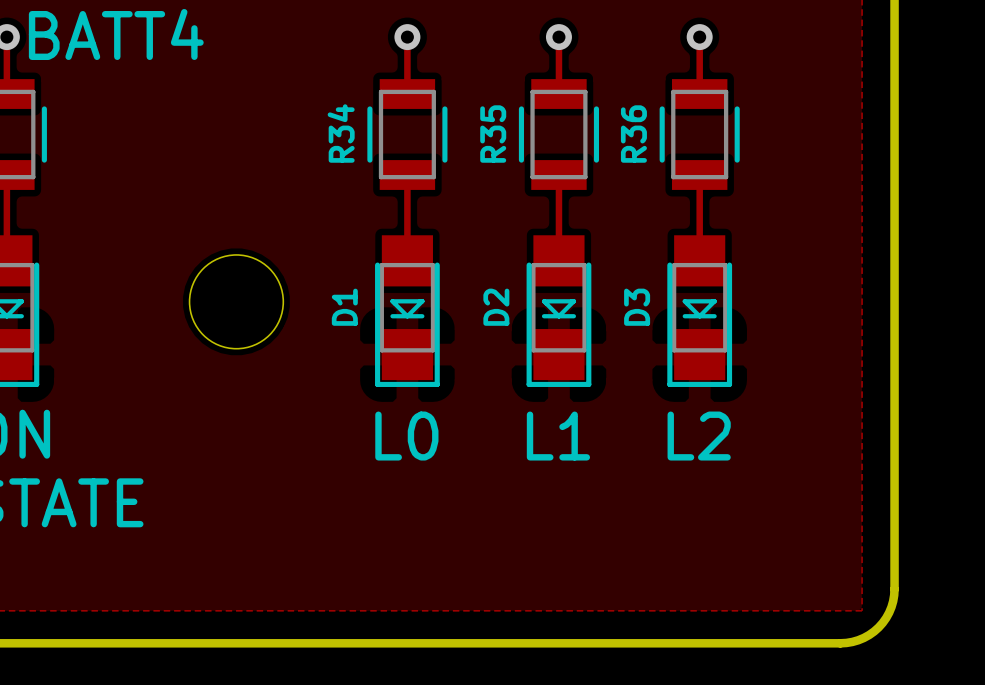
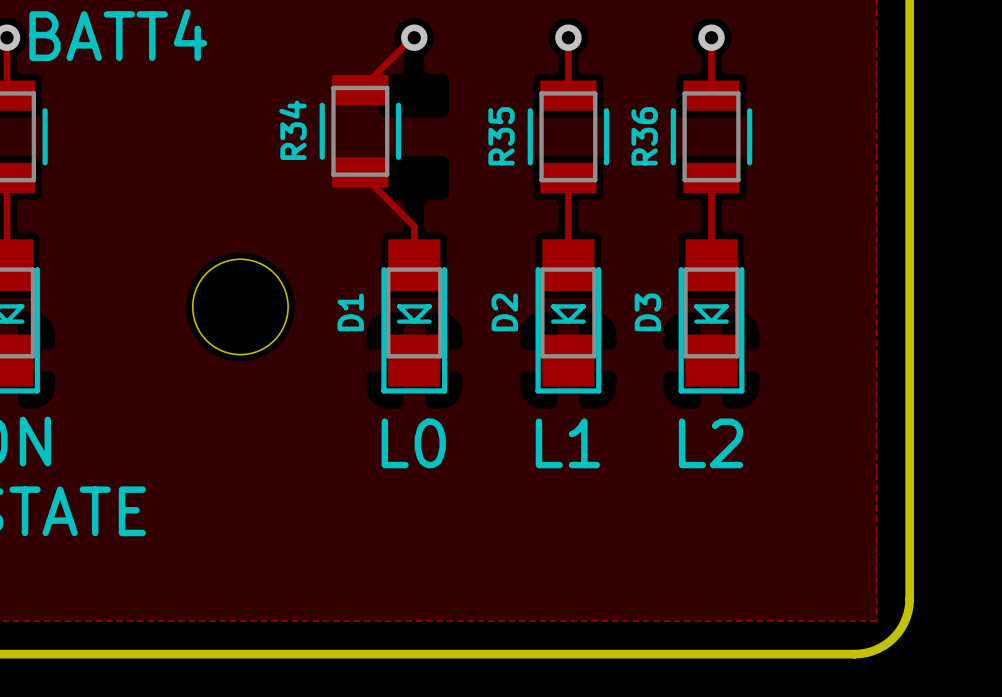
track: (407, 37) (407, 94) -> (414, 37) (360, 90)
R34 position: (407, 134) -> (360, 131)
track: (407, 175) (407, 222) -> (360, 172) (414, 226)

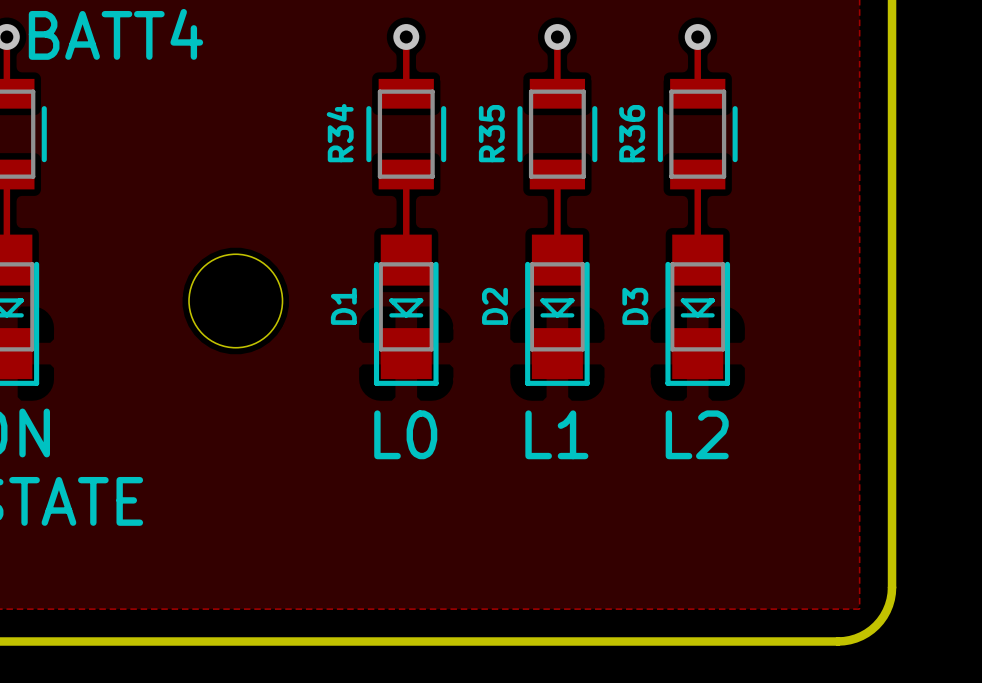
track: (414, 37) (360, 90) -> (406, 36) (406, 93)
R34 position: (360, 131) -> (406, 134)
track: (360, 172) (414, 226) -> (406, 174) (406, 222)

